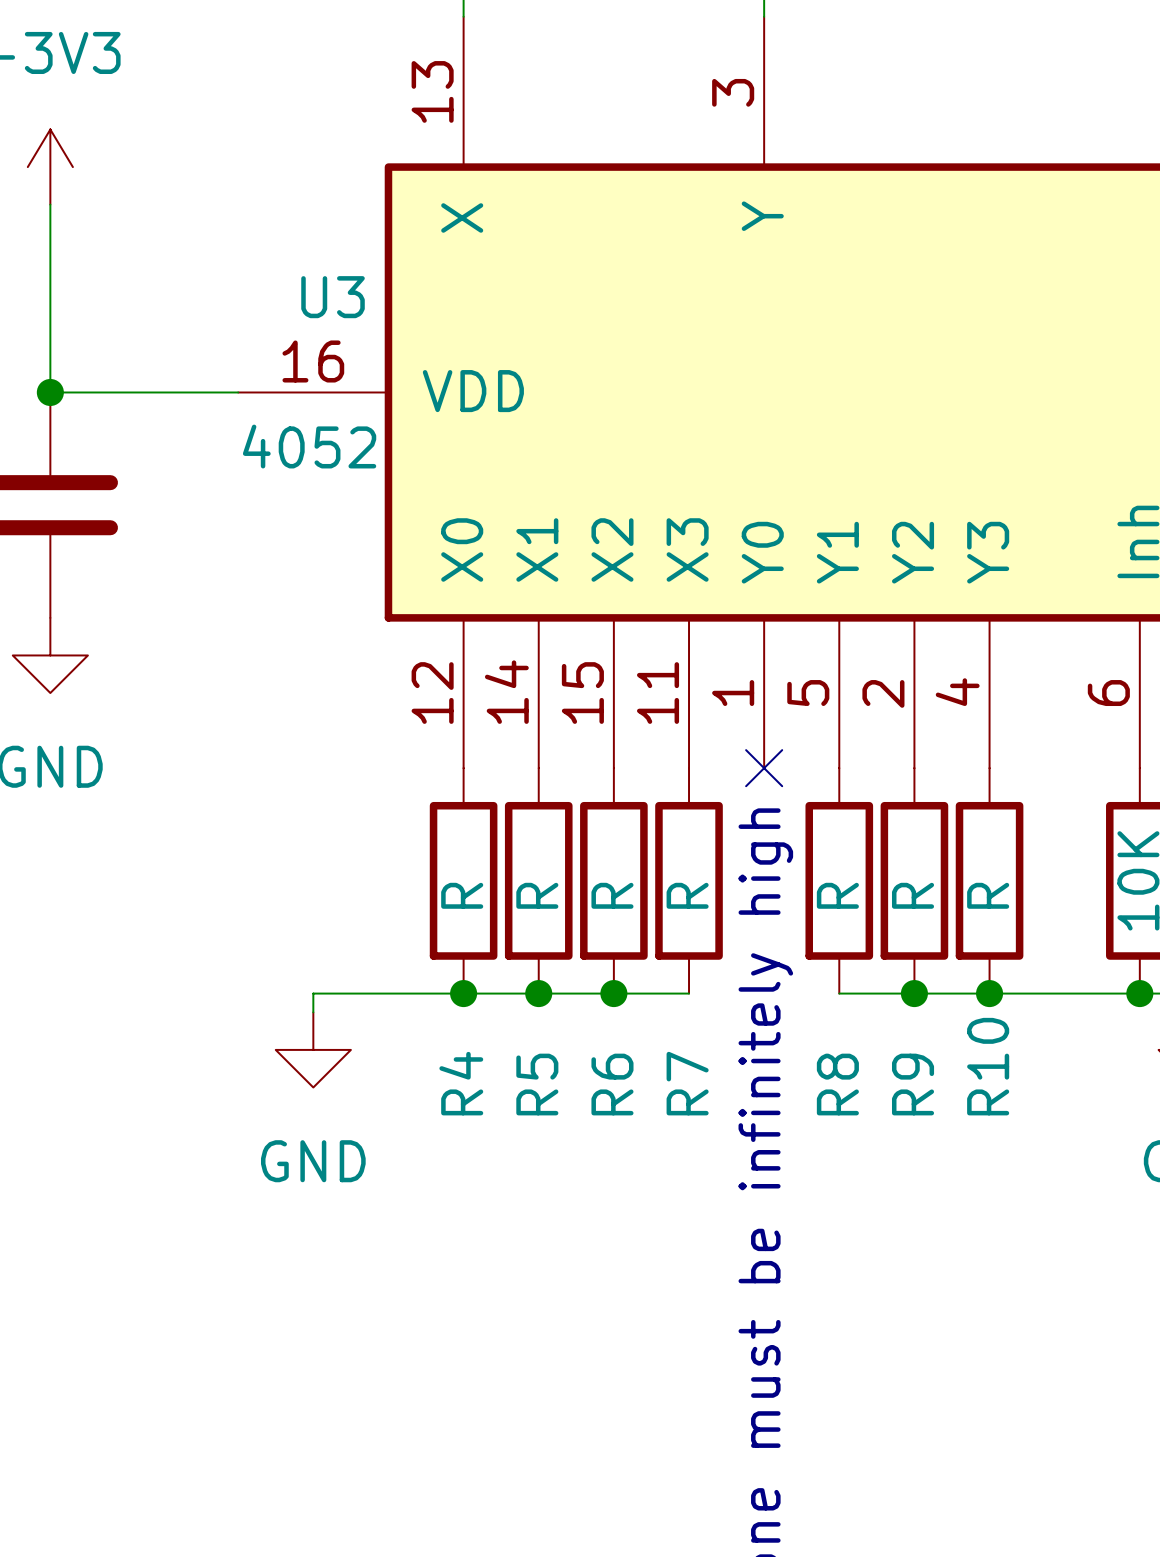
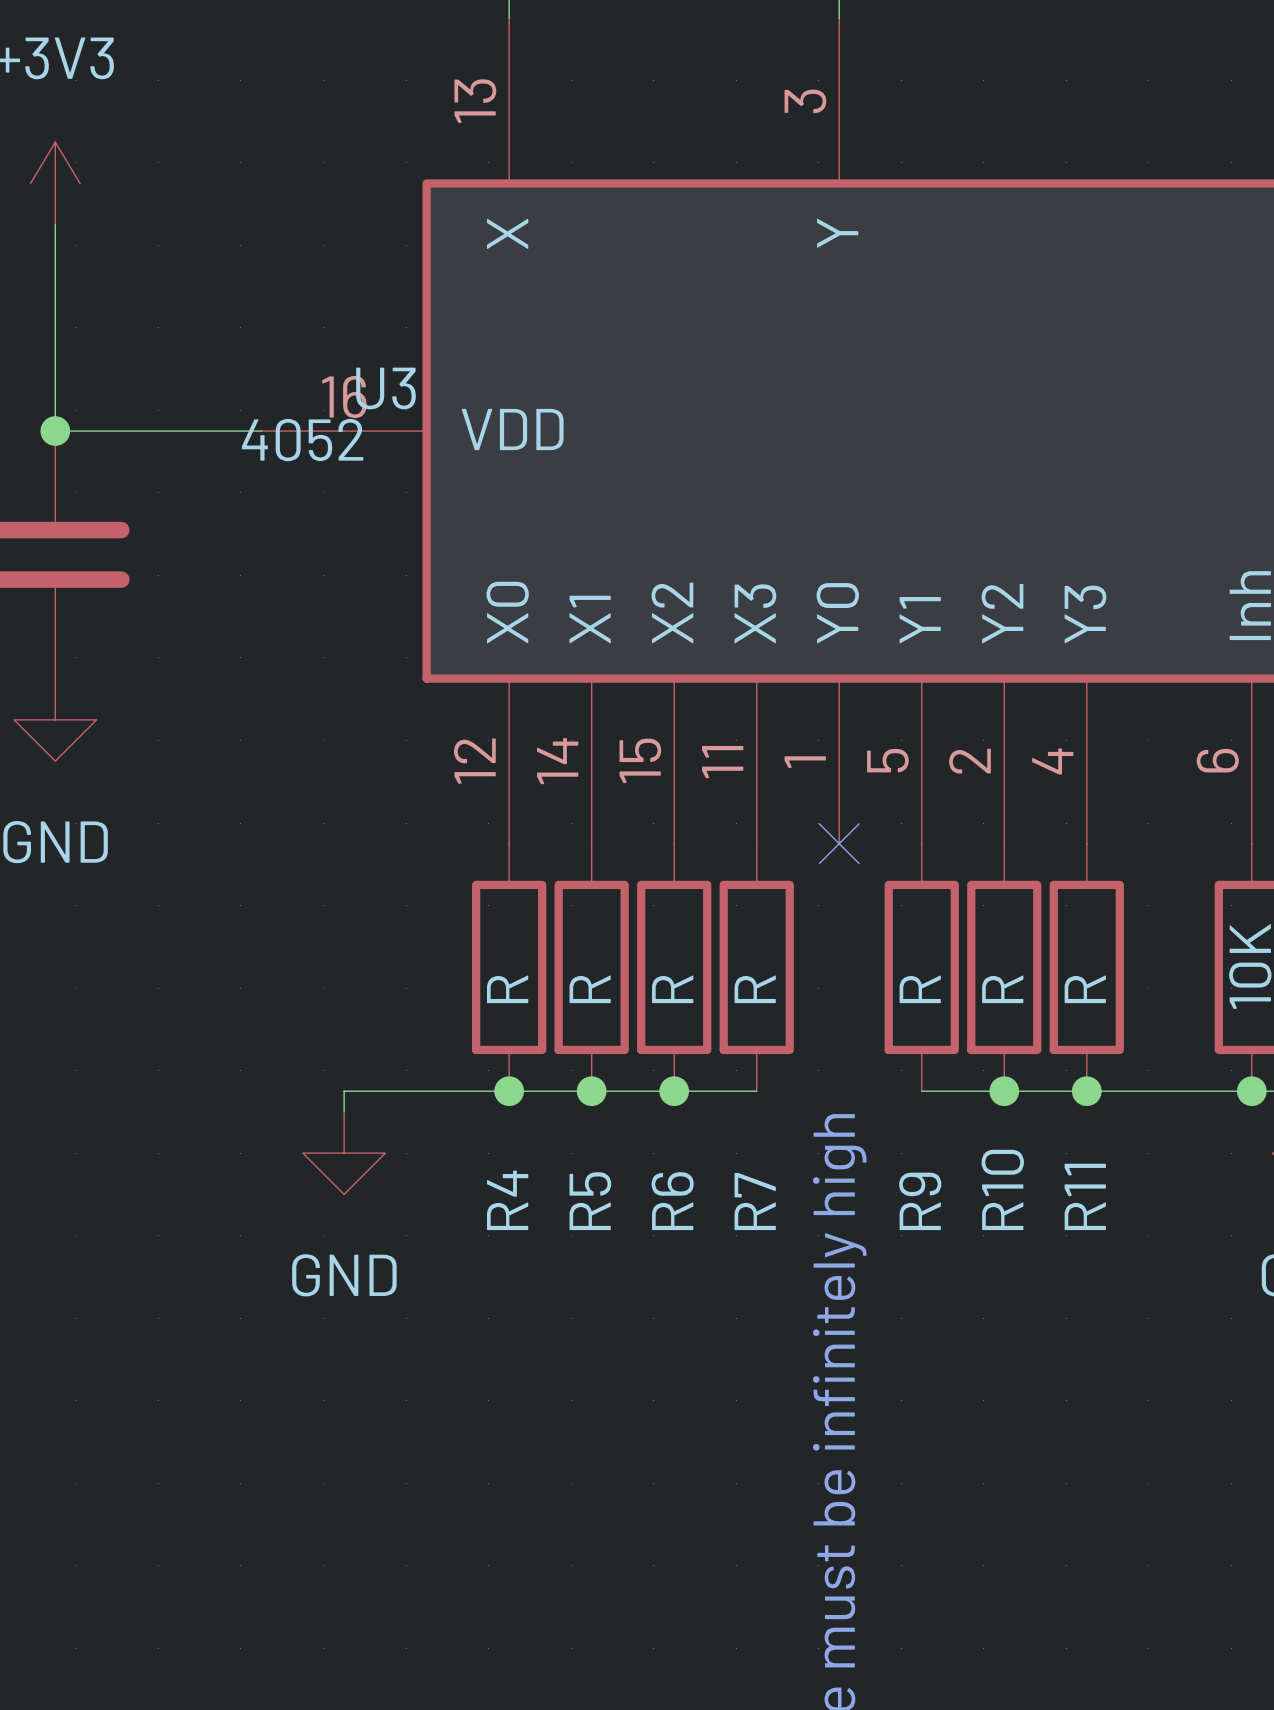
U3 name position: U3 (333, 297) -> U3 (386, 388)
U3 value position: 4052 (309, 446) -> 4052 (302, 440)
R10 name: R10 (988, 1066) -> R11 (1085, 1196)
R8 name: R8 (837, 1084) -> R9 (920, 1201)
R9 name: R9 (913, 1084) -> R10 (1002, 1189)

